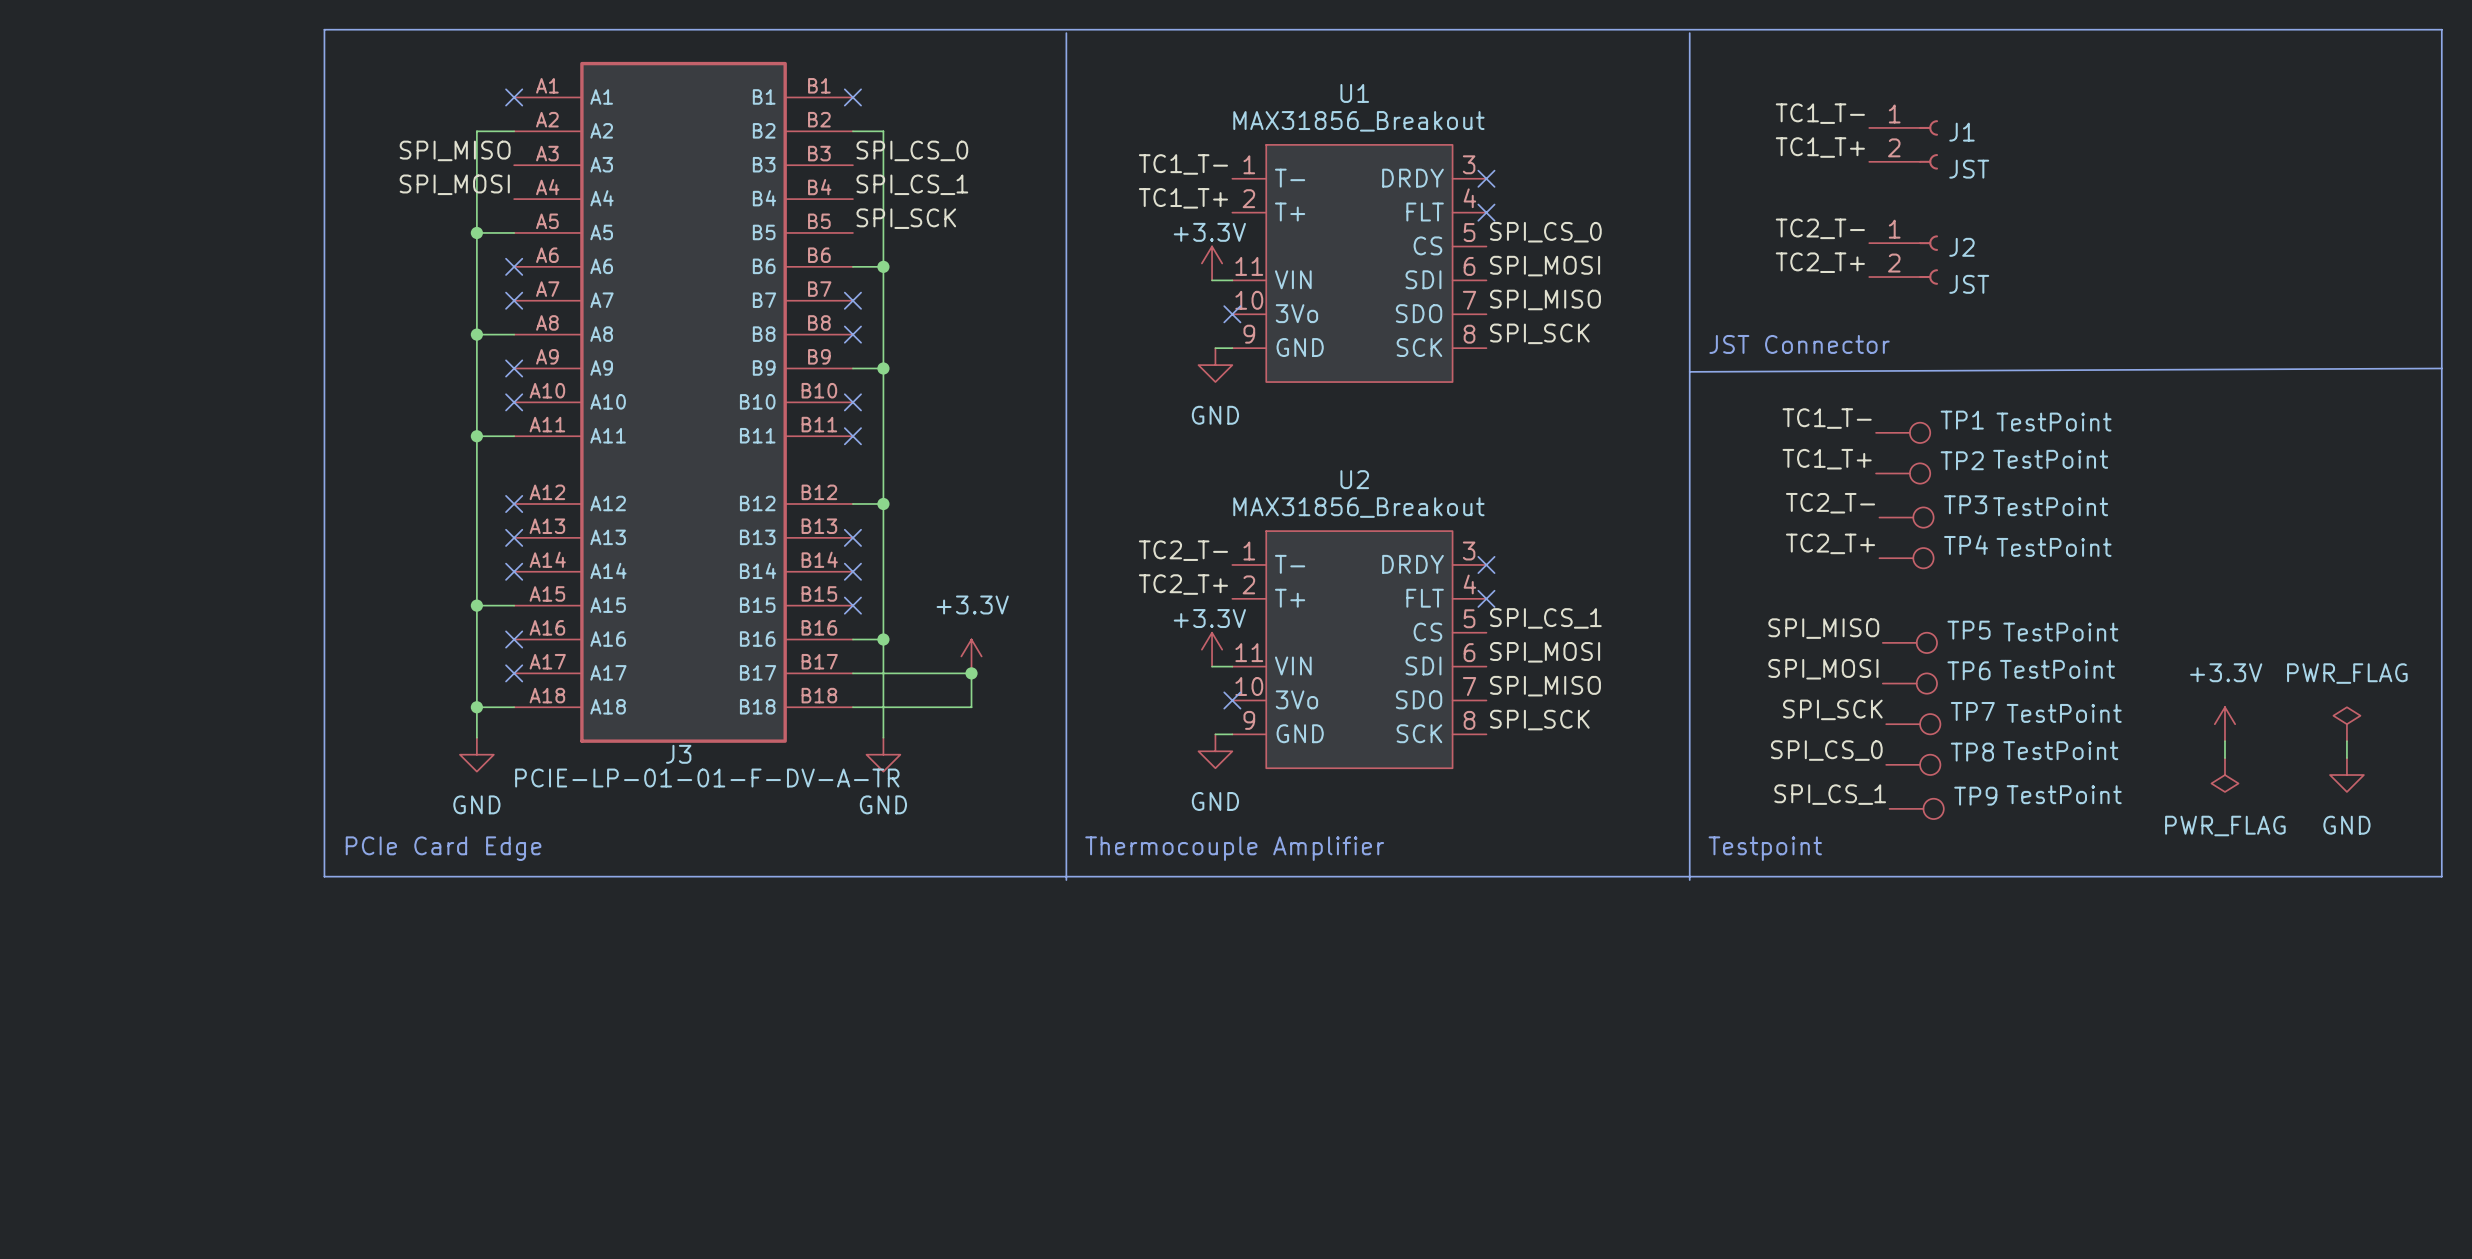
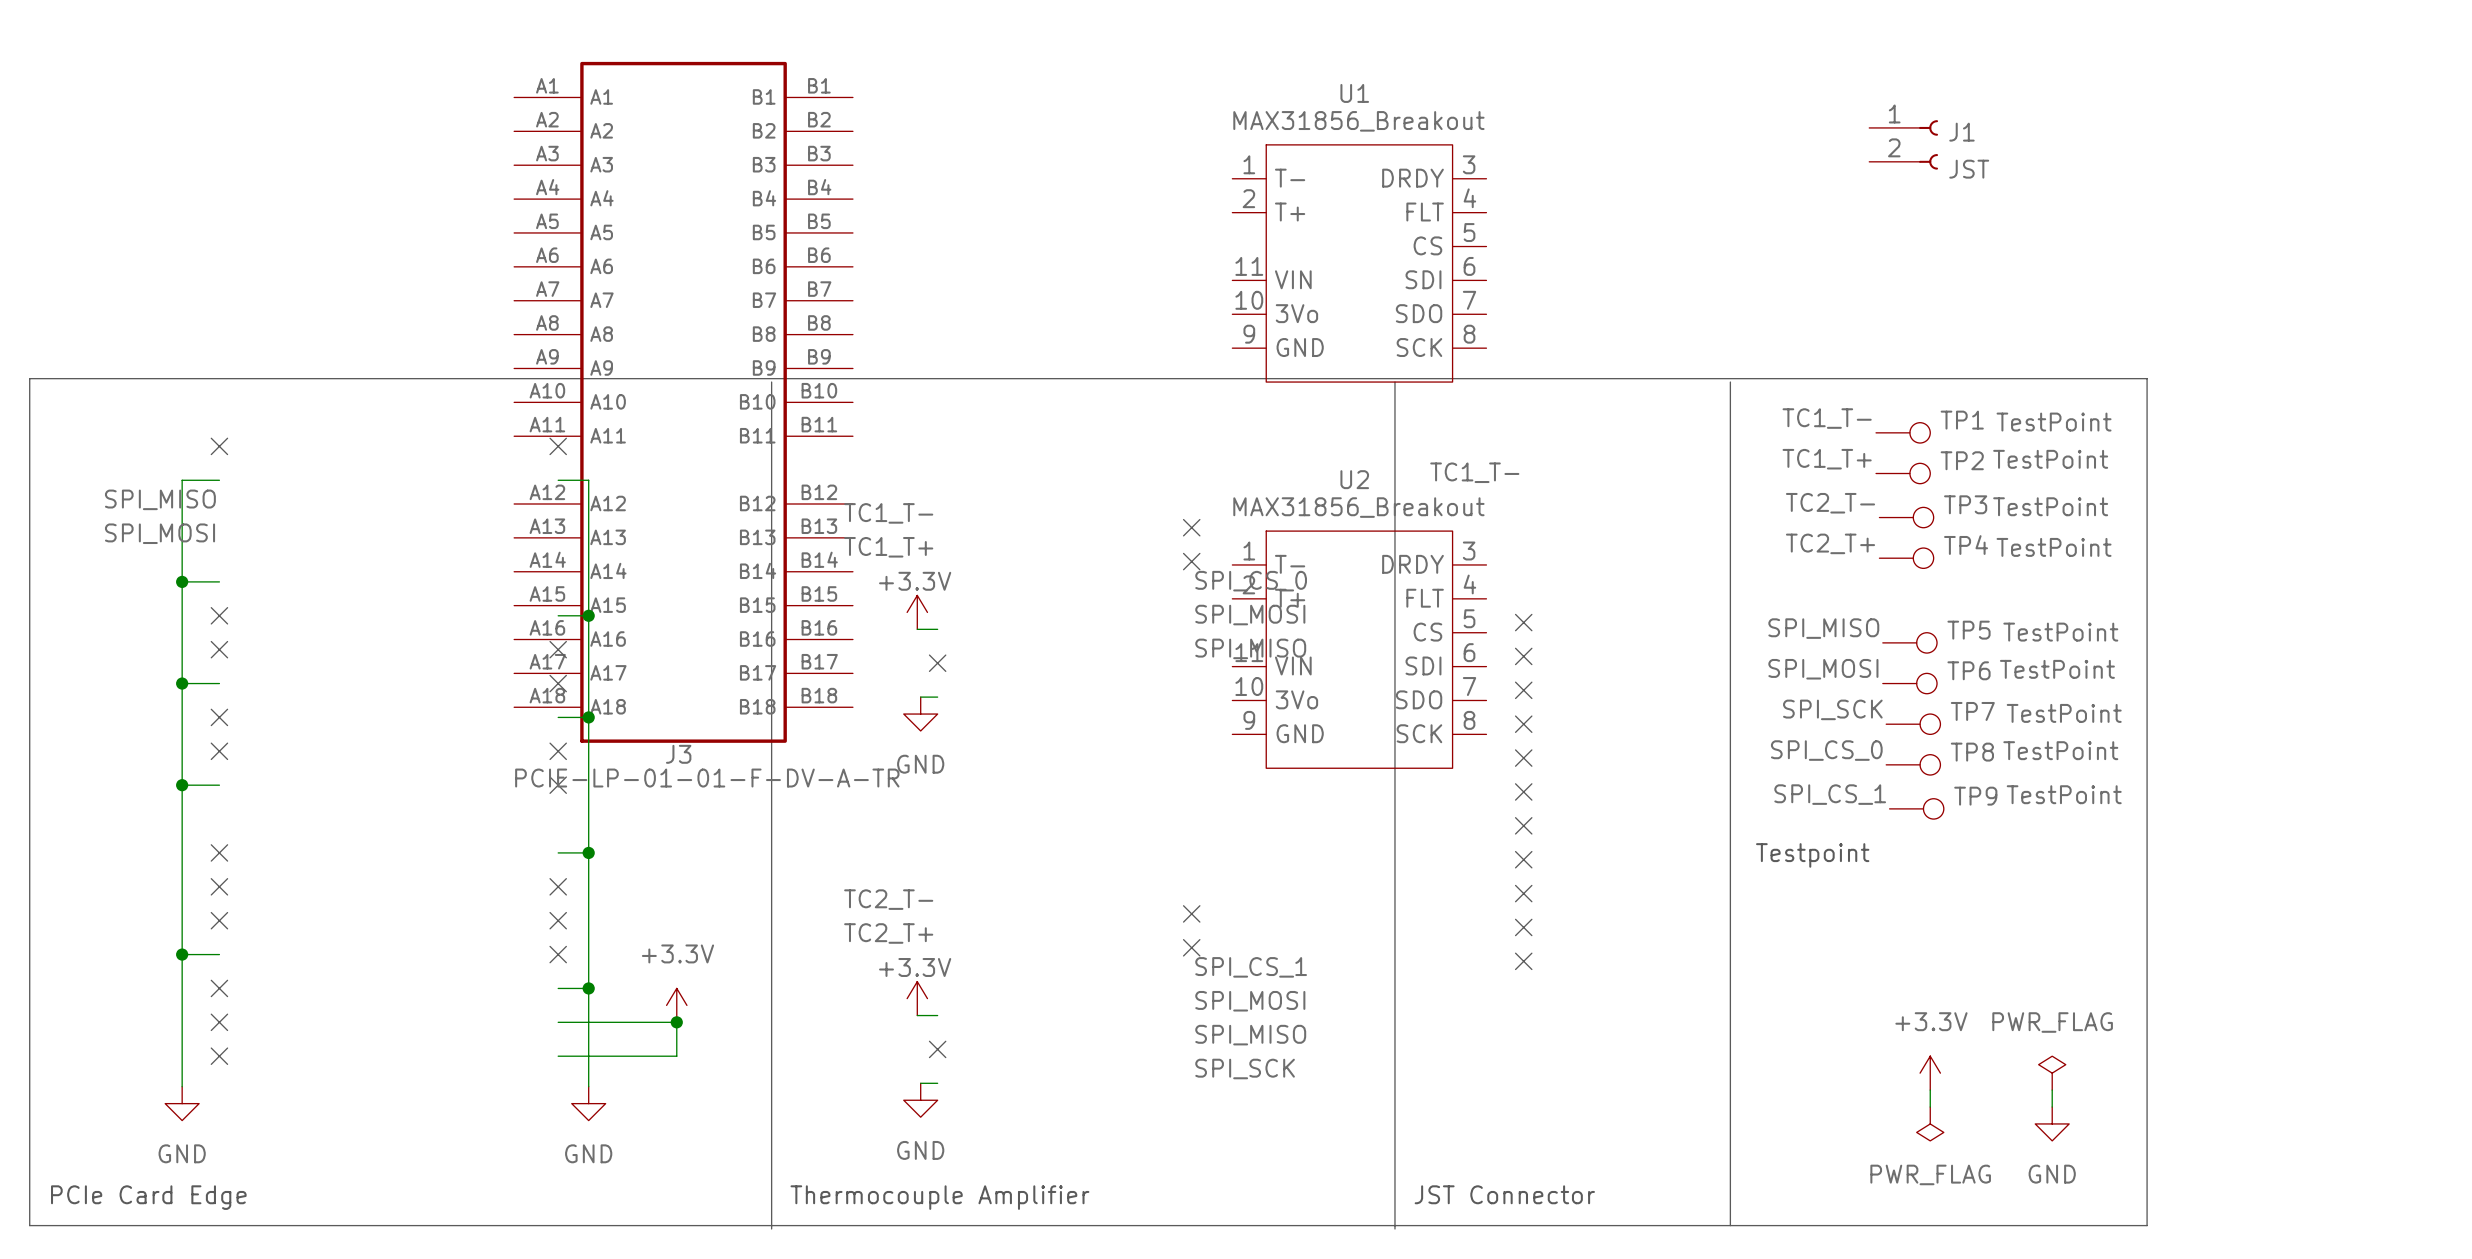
line: (324, 29) (324, 876) (2441, 876) (2441, 29) (324, 29) -> none
line: (1066, 33) (1066, 880) -> none
line: (1689, 33) (1689, 880) -> none
no-connect mark: (514, 97) -> none
no-connect mark: (852, 97) -> none
label: TC1_T- (1820, 113) -> none
wire: (514, 131) (476, 131) (476, 737) -> none
wire: (852, 131) (883, 131) (883, 737) -> none
label: TC1_T+ (1820, 147) -> none
label: SPI_MISO (455, 150) -> none
label: SPI_CS_0 (912, 150) -> none
label: TC1_T- (1183, 164) -> none
no-connect mark: (1486, 178) -> none
label: SPI_MOSI (454, 184) -> none
label: SPI_CS_1 (912, 184) -> none
label: TC1_T+ (1183, 198) -> none
no-connect mark: (1486, 212) -> none
label: SPI_SCK (906, 218) -> none
label: TC2_T- (1820, 228) -> none
wire: (476, 232) (514, 232) -> none
junction: (476, 232) -> none
label: SPI_CS_0 (1545, 232) -> none
J2: JST (1903, 260) -> none
label: TC2_T+ (1820, 262) -> none
power symbol: +3.3V (1212, 263) -> none
no-connect mark: (514, 266) -> none
wire: (852, 266) (883, 266) -> none
junction: (883, 266) -> none
label: SPI_MOSI (1545, 266) -> none
wire: (1212, 280) (1232, 280) -> none
label: SPI_MISO (1545, 299) -> none
no-connect mark: (514, 300) -> none
no-connect mark: (852, 300) -> none
no-connect mark: (1232, 314) -> none
label: SPI_SCK (1539, 333) -> none
wire: (476, 334) (514, 334) -> none
junction: (476, 334) -> none
no-connect mark: (852, 334) -> none
text: JST Connector (1799, 344) -> none
wire: (1215, 348) (1232, 348) -> none
power symbol: GND (1215, 365) -> none
no-connect mark: (514, 368) -> none
wire: (852, 368) (883, 368) -> none
junction: (883, 368) -> none
line: (2441, 368) (1689, 371) -> none
line: none -> (29, 378) (29, 1225) (2147, 1225) (2147, 378) (29, 378)
line: none -> (771, 382) (771, 1228)
line: none -> (1394, 382) (1394, 1228)
line: none -> (1730, 382) (1730, 1225)
no-connect mark: (514, 402) -> none
no-connect mark: (852, 402) -> none
wire: (476, 436) (514, 436) -> none
junction: (476, 436) -> none
no-connect mark: (852, 436) -> none
no-connect mark: none -> (219, 446)
no-connect mark: none -> (558, 446)
label: none -> TC1_T- (1474, 472)
wire: none -> (219, 480) (182, 480) (182, 1086)
wire: none -> (558, 480) (588, 480) (588, 1086)
label: none -> SPI_MISO (160, 499)
no-connect mark: (514, 503) -> none
wire: (852, 503) (883, 503) -> none
junction: (883, 503) -> none
label: none -> TC1_T- (888, 513)
no-connect mark: none -> (1191, 527)
label: none -> SPI_MOSI (160, 533)
no-connect mark: (514, 537) -> none
no-connect mark: (852, 537) -> none
label: none -> TC1_T+ (888, 547)
label: TC2_T- (1183, 550) -> none
no-connect mark: none -> (1191, 561)
no-connect mark: (1486, 564) -> none
no-connect mark: (514, 571) -> none
no-connect mark: (852, 571) -> none
junction: none -> (182, 581)
label: none -> SPI_CS_0 (1251, 581)
label: TC2_T+ (1183, 584) -> none
no-connect mark: (1486, 598) -> none
power symbol text position: +3.3V (972, 604) -> +3.3V (915, 581)
wire: (476, 605) (514, 605) -> (182, 581) (219, 581)
junction: (476, 605) -> none
no-connect mark: (852, 605) -> none
no-connect mark: none -> (219, 615)
junction: none -> (588, 615)
label: none -> SPI_MOSI (1250, 615)
label: SPI_CS_1 (1545, 618) -> none
no-connect mark: none -> (1523, 622)
no-connect mark: (514, 639) -> none
wire: (852, 639) (883, 639) -> (558, 615) (588, 615)
junction: (883, 639) -> none
label: none -> SPI_MISO (1250, 648)
no-connect mark: none -> (219, 649)
no-connect mark: none -> (558, 649)
power symbol: +3.3V (1212, 649) -> none
label: SPI_MOSI (1545, 652) -> none
power symbol position: +3.3V (971, 656) -> +3.3V (917, 612)
no-connect mark: none -> (1523, 656)
no-connect mark: none -> (937, 663)
wire: (1212, 666) (1232, 666) -> (917, 629) (937, 629)
no-connect mark: (514, 673) -> none
wire: (852, 673) (971, 673) (971, 707) (852, 707) -> none
junction: (971, 673) -> none
junction: none -> (182, 683)
no-connect mark: none -> (558, 683)
label: SPI_MISO (1545, 686) -> none
no-connect mark: none -> (1523, 690)
no-connect mark: (1232, 700) -> none
wire: (476, 707) (514, 707) -> (182, 683) (219, 683)
junction: (476, 707) -> none
no-connect mark: none -> (219, 717)
wire: none -> (558, 717) (588, 717)
junction: none -> (588, 717)
label: SPI_SCK (1539, 720) -> none
no-connect mark: none -> (1523, 724)
power symbol: +3.3V (2224, 724) -> none
power symbol: PWR_FLAG (2346, 724) -> none
wire: (1215, 734) (1232, 734) -> (920, 697) (937, 697)
wire: (2224, 741) (2224, 758) -> none
wire: (2346, 741) (2346, 758) -> none
no-connect mark: none -> (219, 751)
no-connect mark: none -> (558, 751)
power symbol: GND (1215, 751) -> none
power symbol: GND (476, 754) -> none
power symbol position: GND (883, 754) -> GND (920, 714)
no-connect mark: none -> (1523, 758)
power symbol: PWR_FLAG (2224, 775) -> none
power symbol: GND (2346, 775) -> none
wire: none -> (182, 785) (219, 785)
junction: none -> (182, 785)
no-connect mark: none -> (558, 785)
no-connect mark: none -> (1523, 791)
no-connect mark: none -> (1523, 825)
text: PCIe Card Edge (443, 848) -> none
text: Thermocouple Amplifier (1234, 848) -> none
text position: Testpoint (1765, 848) -> Testpoint (1812, 855)
no-connect mark: none -> (219, 852)
wire: none -> (558, 852) (588, 852)
junction: none -> (588, 852)
no-connect mark: none -> (1523, 859)
no-connect mark: none -> (219, 886)
no-connect mark: none -> (558, 886)
no-connect mark: none -> (1523, 893)
label: none -> TC2_T- (888, 899)
no-connect mark: none -> (1191, 913)
no-connect mark: none -> (219, 920)
no-connect mark: none -> (558, 920)
no-connect mark: none -> (1523, 927)
label: none -> TC2_T+ (888, 933)
no-connect mark: none -> (1191, 947)
wire: none -> (182, 954) (219, 954)
junction: none -> (182, 954)
no-connect mark: none -> (558, 954)
no-connect mark: none -> (1523, 961)
label: none -> SPI_CS_1 (1251, 967)
no-connect mark: none -> (219, 988)
wire: none -> (558, 988) (588, 988)
junction: none -> (588, 988)
power symbol: none -> +3.3V (917, 998)
label: none -> SPI_MOSI (1250, 1001)
power symbol: none -> +3.3V (676, 1005)
wire: none -> (917, 1015) (937, 1015)
no-connect mark: none -> (219, 1022)
wire: none -> (558, 1022) (676, 1022) (676, 1056) (558, 1056)
junction: none -> (676, 1022)
label: none -> SPI_MISO (1250, 1035)
no-connect mark: none -> (937, 1049)
no-connect mark: none -> (219, 1056)
label: none -> SPI_SCK (1245, 1068)
power symbol: none -> +3.3V (1930, 1073)
power symbol: none -> PWR_FLAG (2052, 1073)
wire: none -> (920, 1083) (937, 1083)
wire: none -> (1930, 1090) (1930, 1107)
wire: none -> (2052, 1090) (2052, 1107)
power symbol: none -> GND (920, 1100)
power symbol: none -> GND (182, 1103)
power symbol: none -> GND (588, 1103)
power symbol: none -> PWR_FLAG (1930, 1123)
power symbol: none -> GND (2052, 1123)
text: none -> JST Connector (1504, 1194)
text: none -> PCIe Card Edge (148, 1197)
text: none -> Thermocouple Amplifier (939, 1197)

